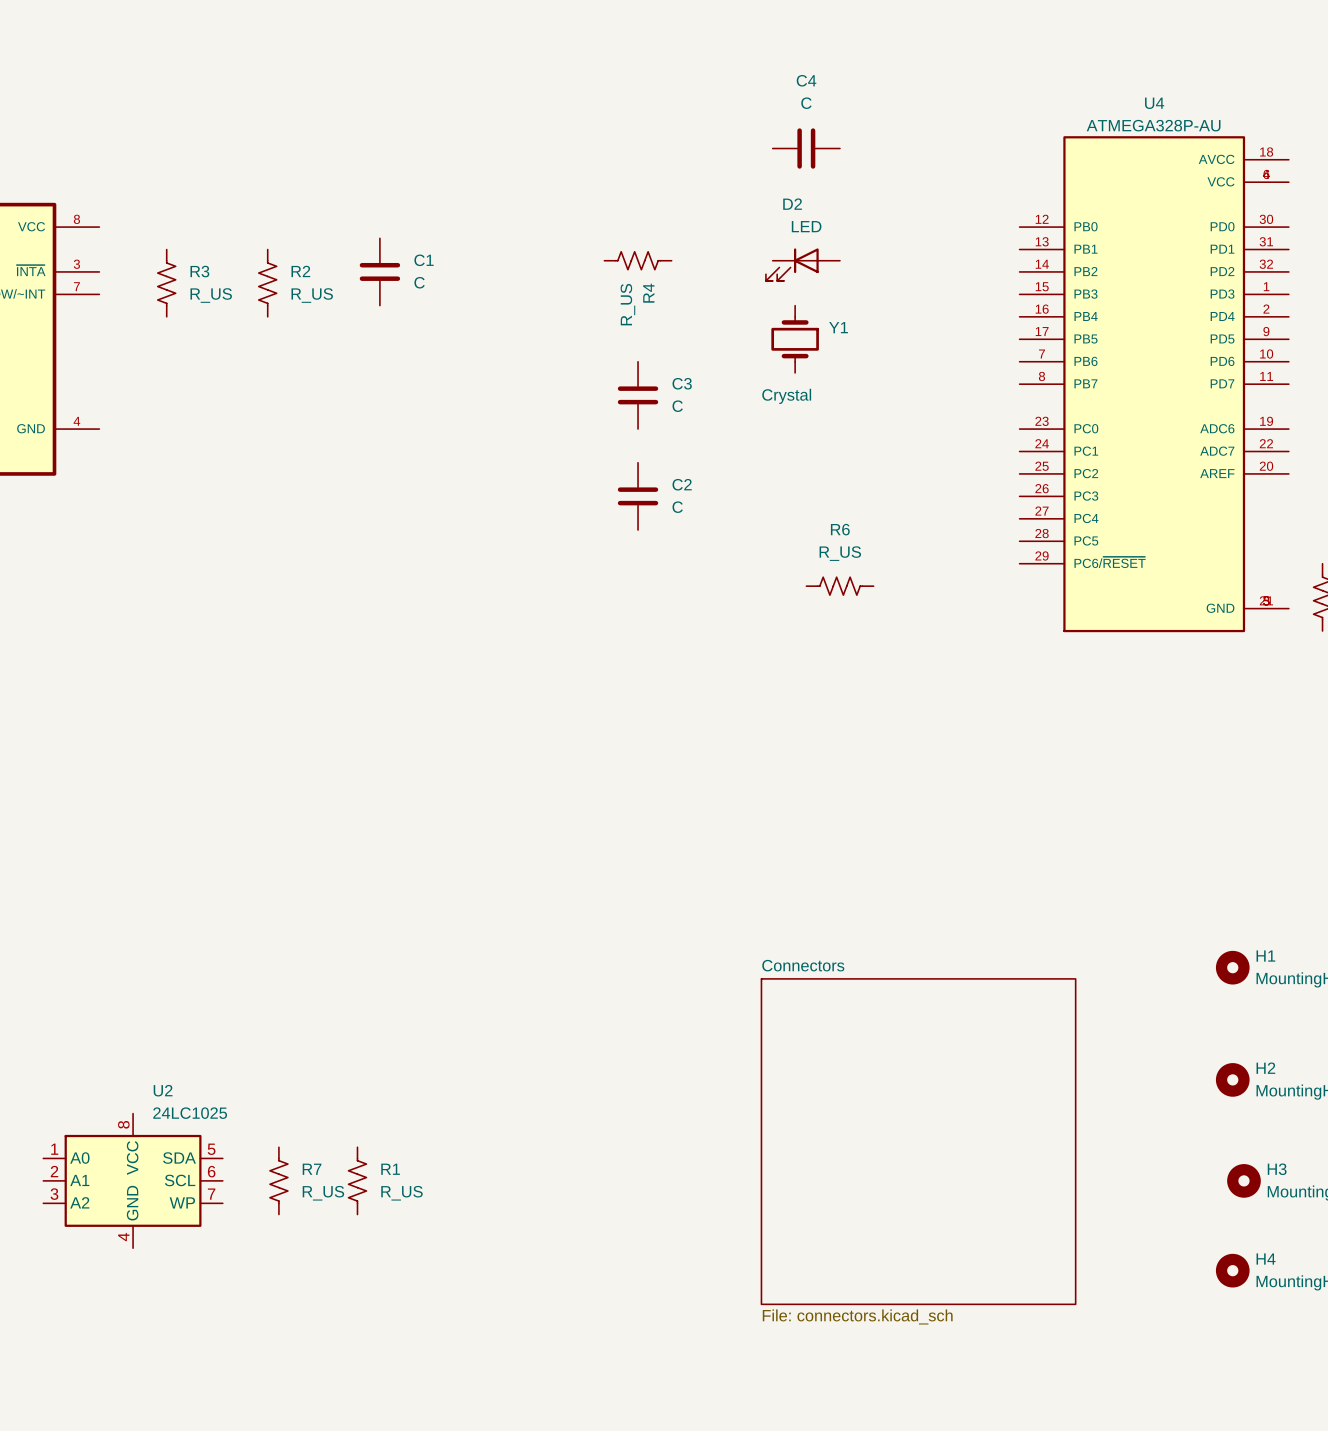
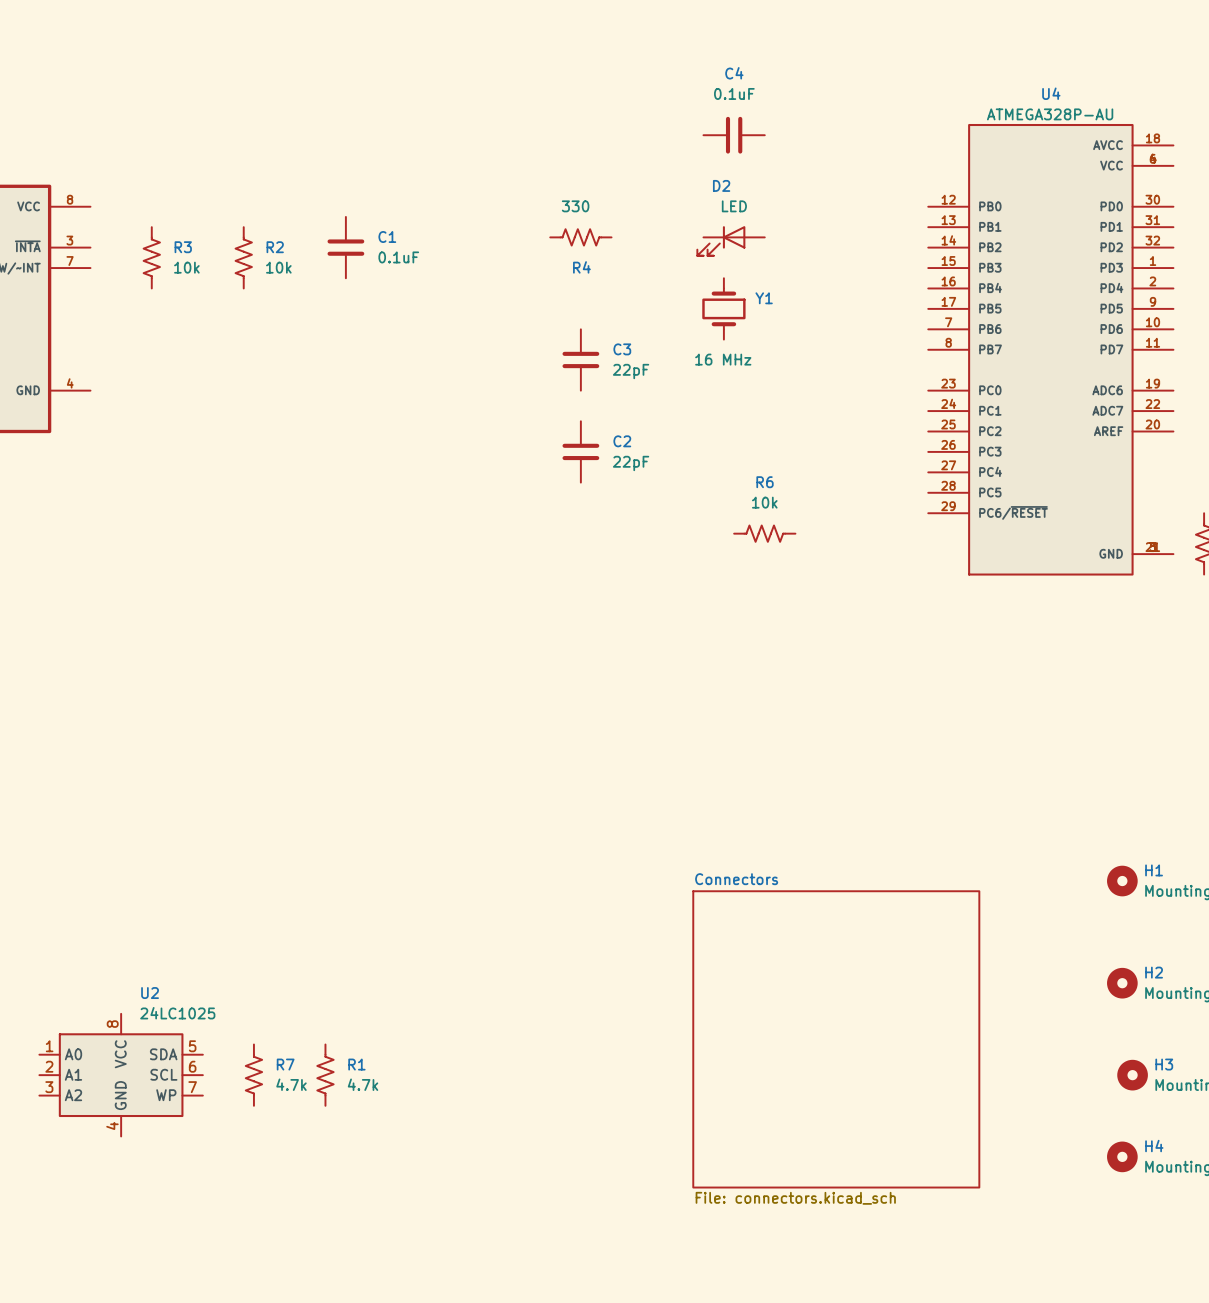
C4 value: C (806, 103) -> 0.1uF (734, 93)
C1 value: C (419, 282) -> 0.1uF (398, 257)
R4 name rotation: 0° (648, 293) -> 90° clockwise (581, 267)
R3 value: R_US (211, 295) -> 10k (186, 267)
R2 value: R_US (312, 295) -> 10k (278, 267)
R4 value: R_US (627, 304) -> 330 (575, 206)
Y1 value: Crystal (786, 396) -> 16 MHz (723, 359)
C3 value: C (677, 406) -> 22pF (631, 371)
C2 value: C (677, 507) -> 22pF (631, 463)
R6 value: R_US (840, 553) -> 10k (764, 502)
R7 value: R_US (323, 1193) -> 4.7k (291, 1084)
R1 value: R_US (401, 1193) -> 4.7k (363, 1084)

